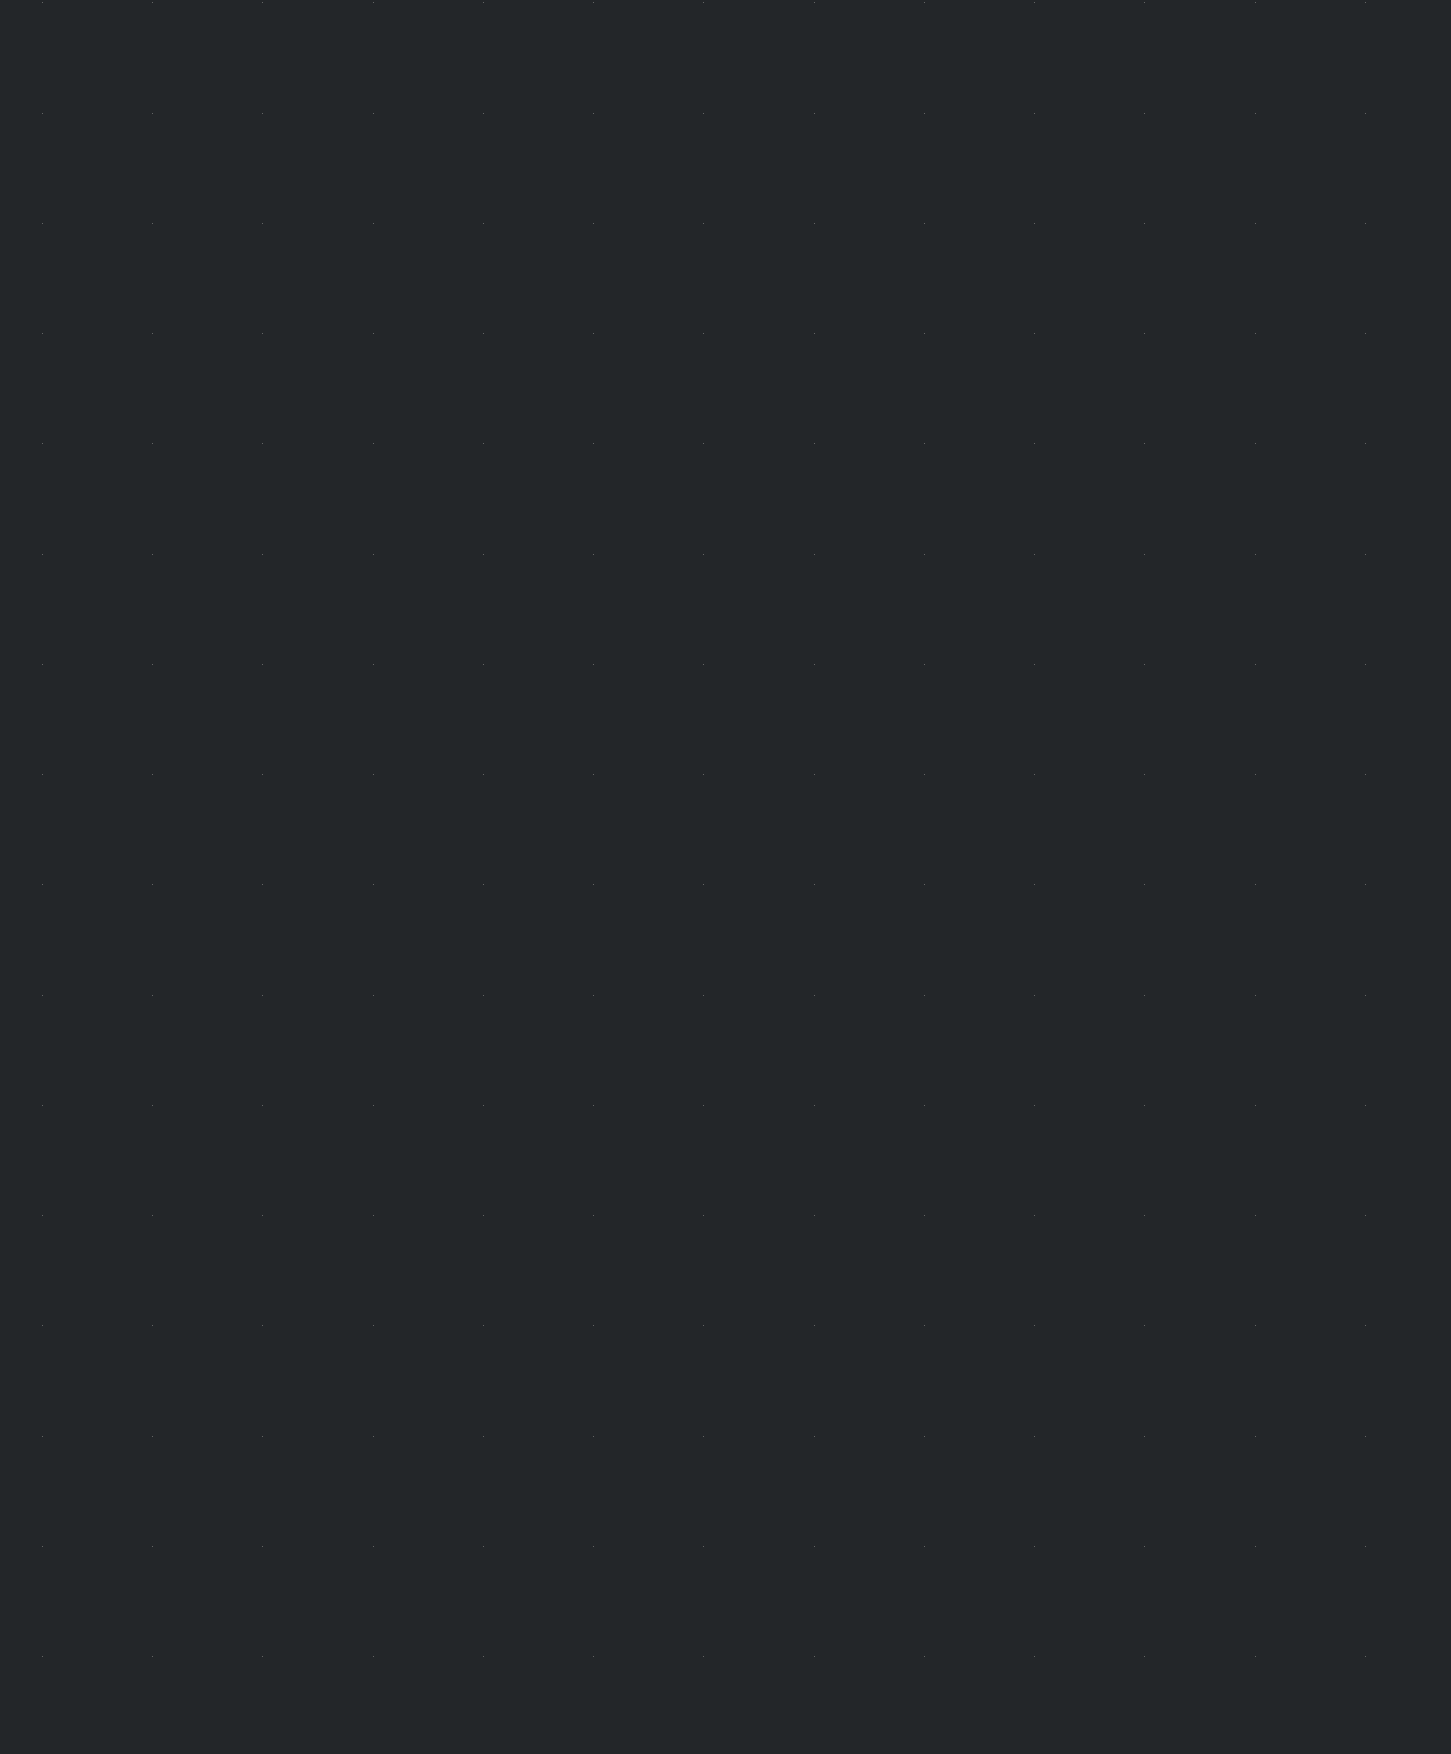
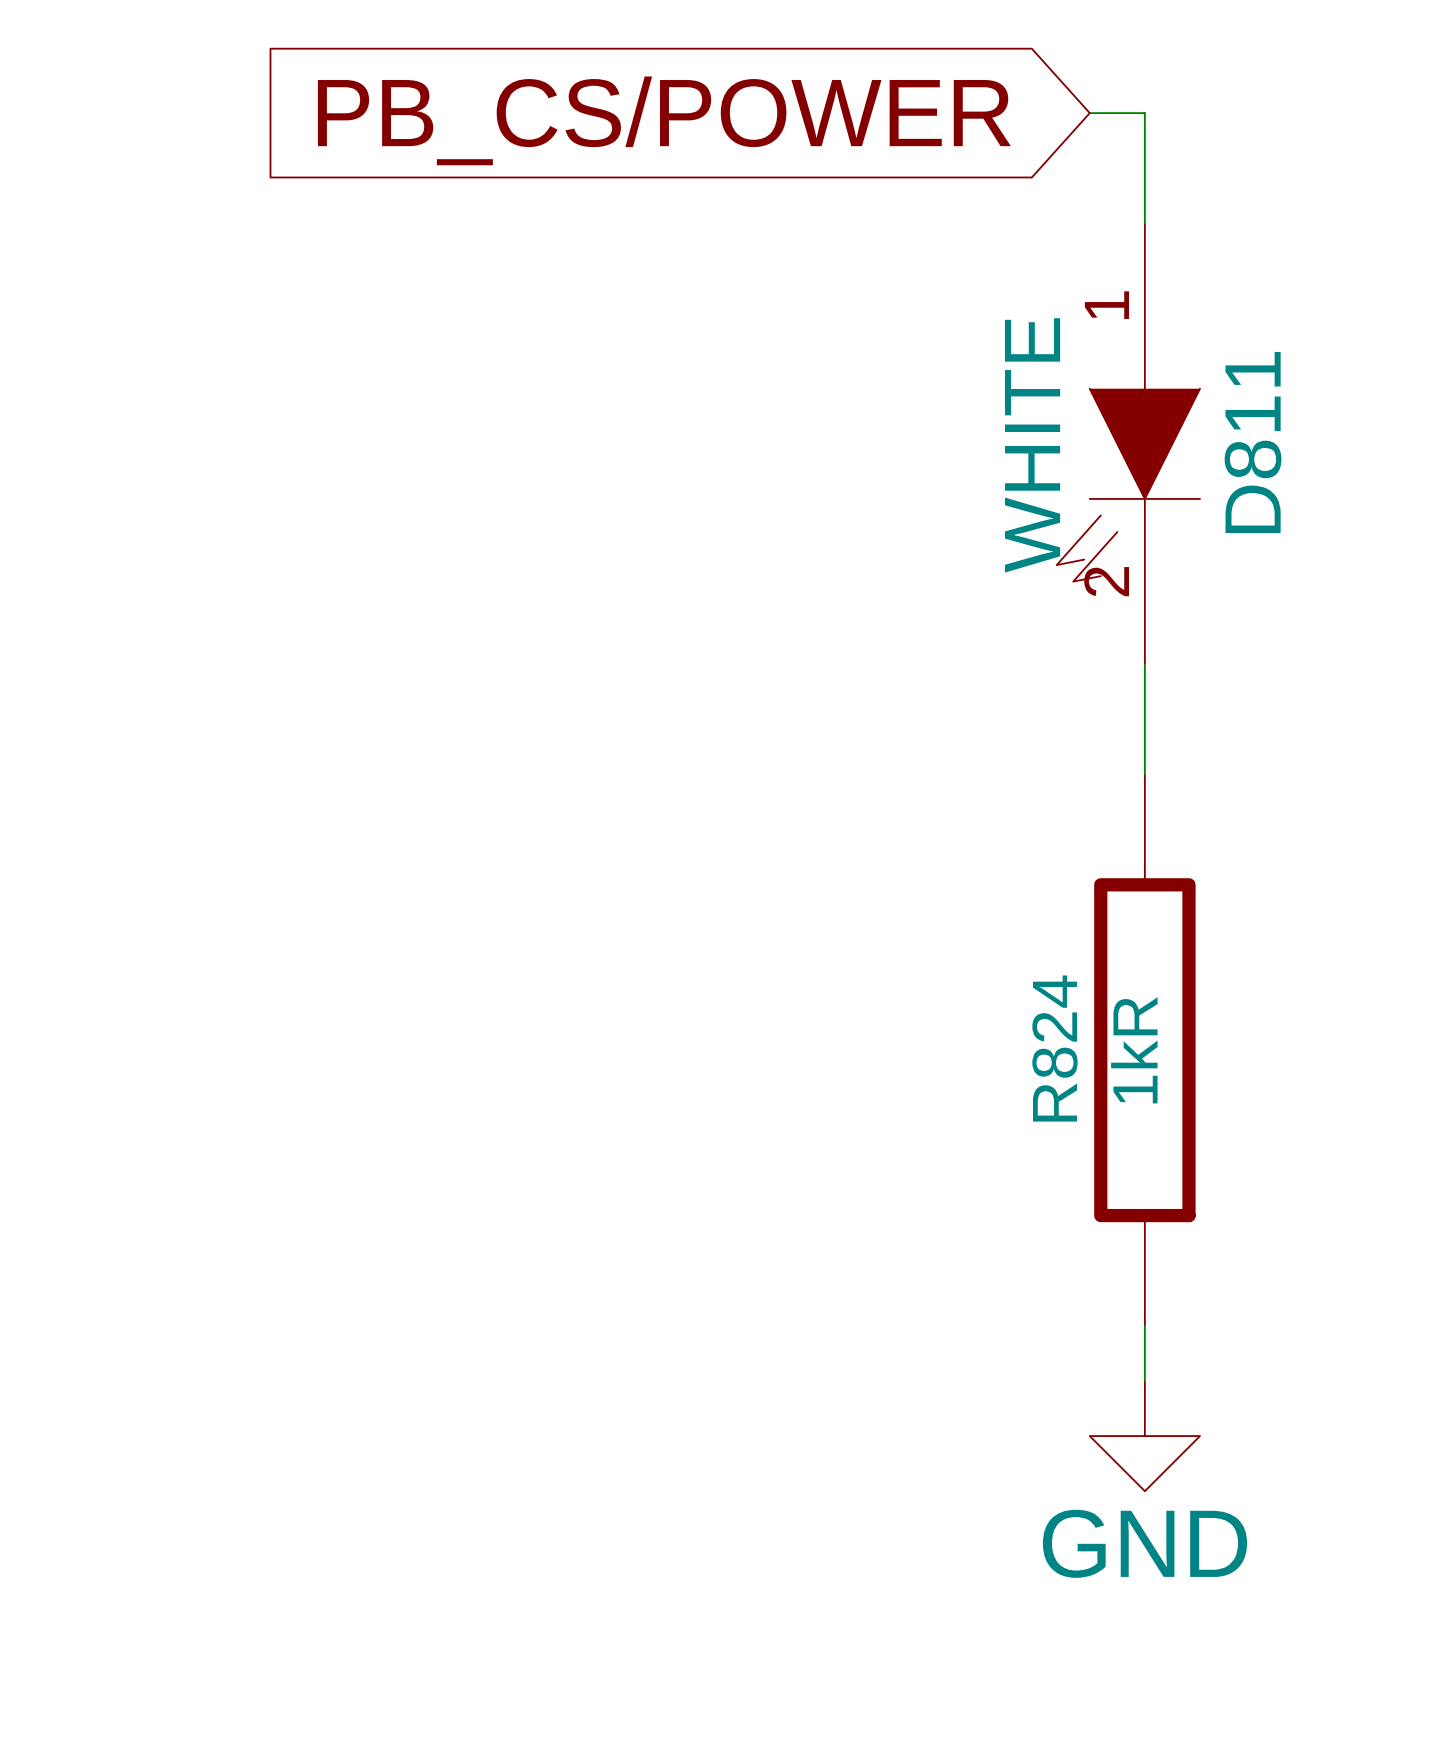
wire: none -> (1089, 113) (1144, 113) (1144, 223)
global label: none -> PB_CS/POWER (664, 120)
D811: none -> WHITE (1128, 443)
wire: none -> (1144, 664) (1144, 774)
R824: none -> 1kR (1144, 1050)
wire: none -> (1144, 1325) (1144, 1380)
power symbol: none -> GND (1144, 1436)

